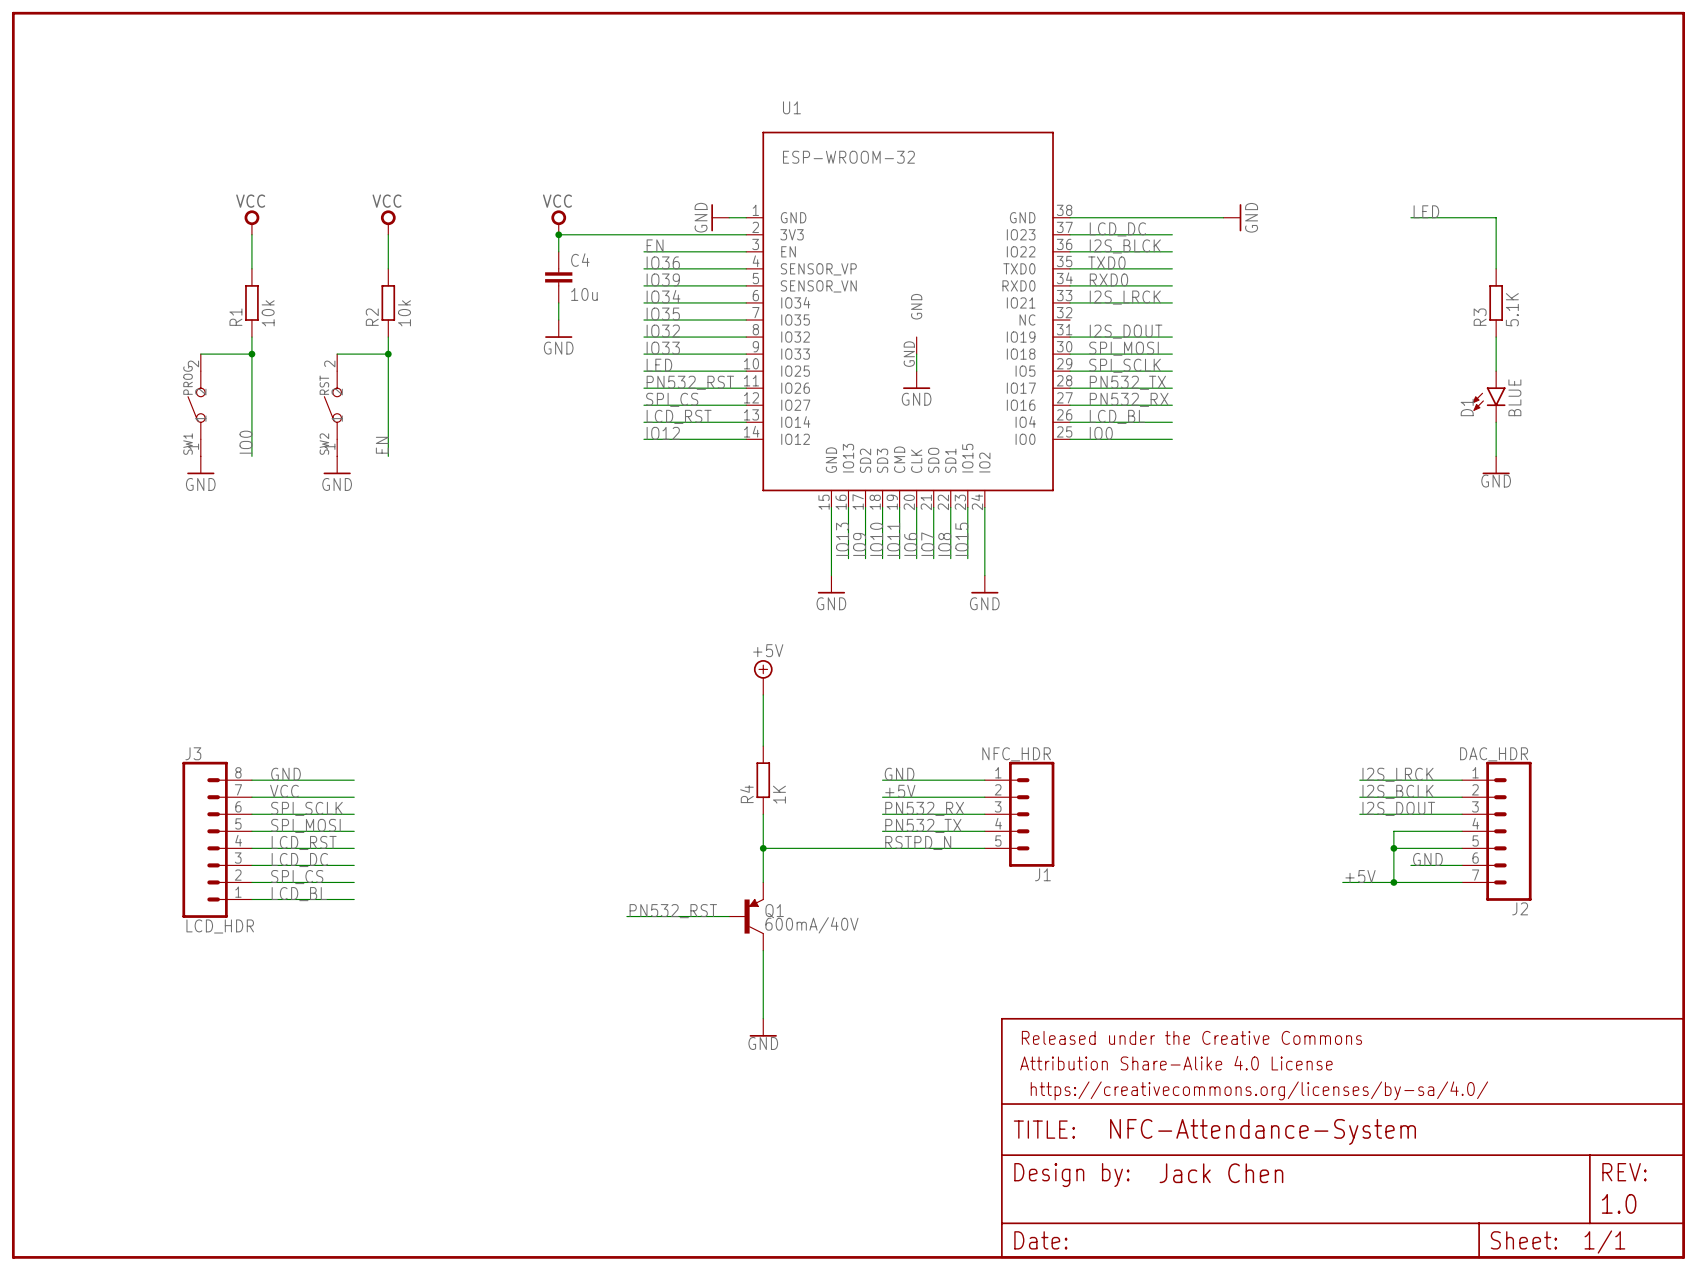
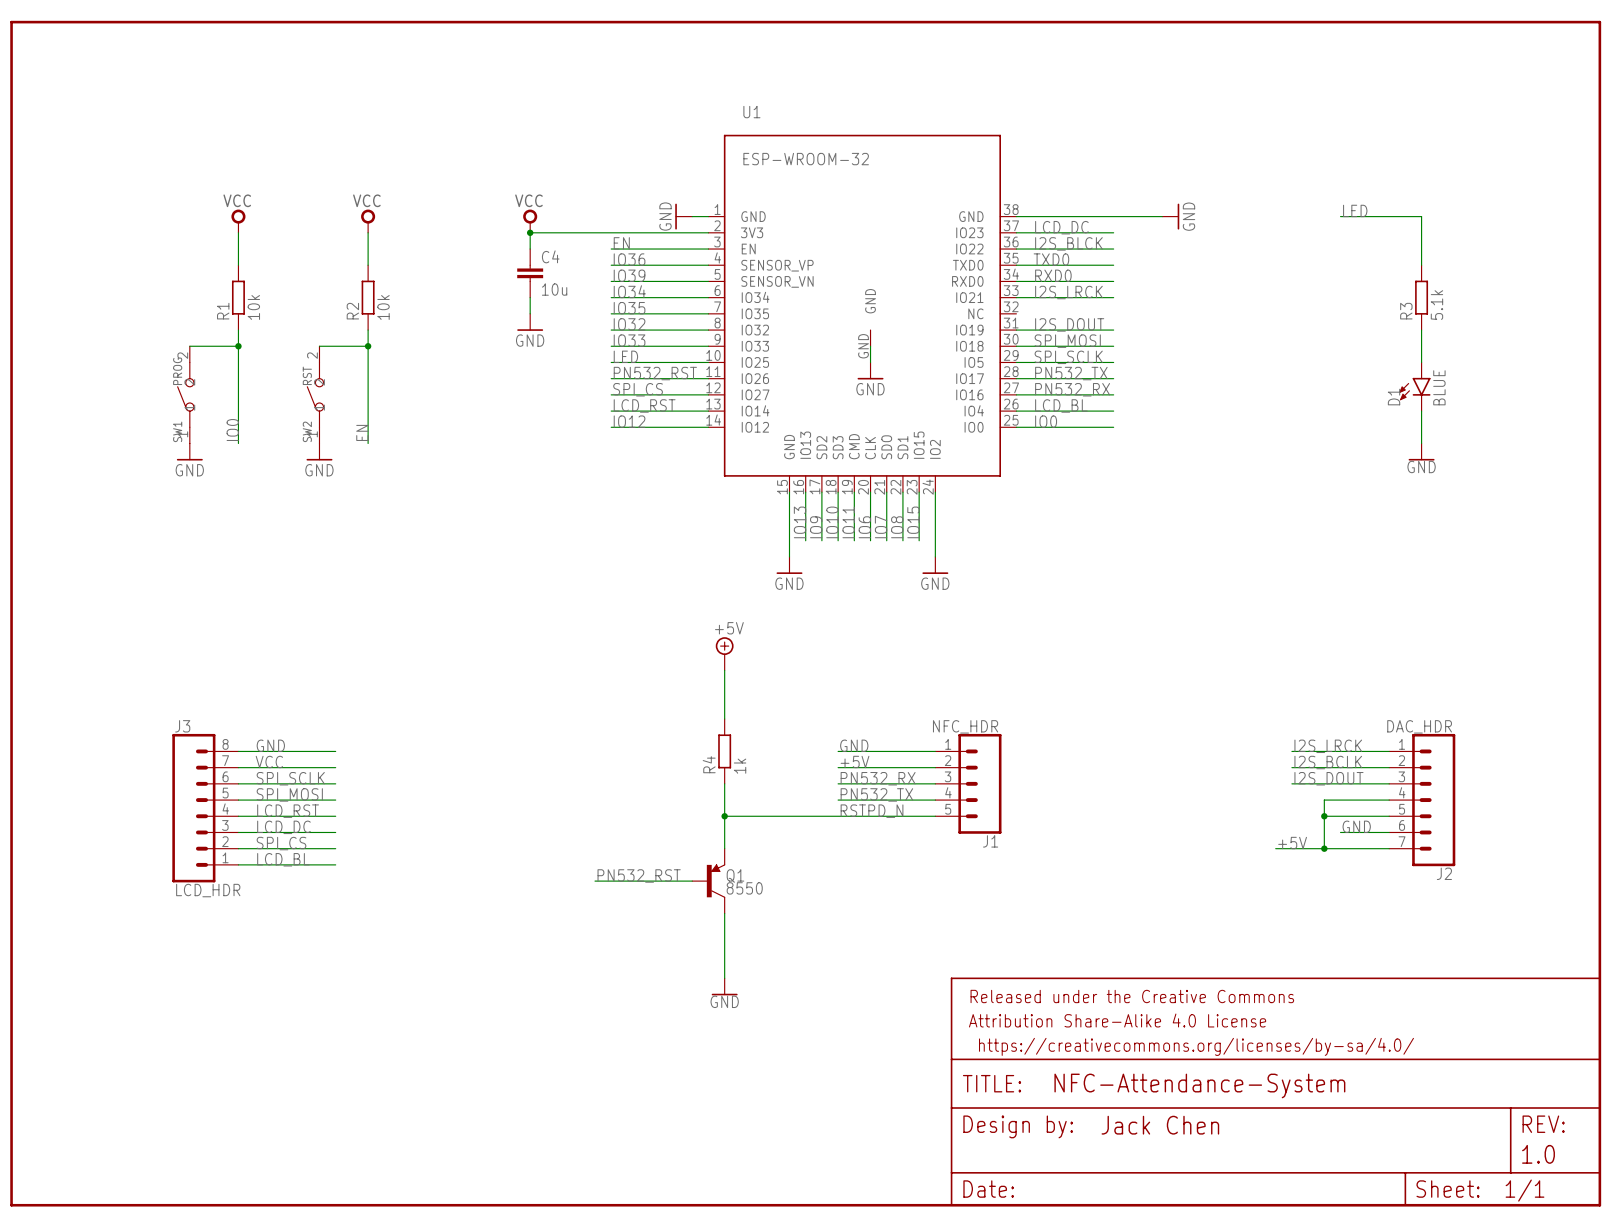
R3 value: 5.1K (1512, 309) -> 5.1k (1436, 305)
R4 value: 1K (779, 794) -> 1k (740, 766)
Q1 value: 600mA/40V (811, 925) -> 8550 (744, 888)

